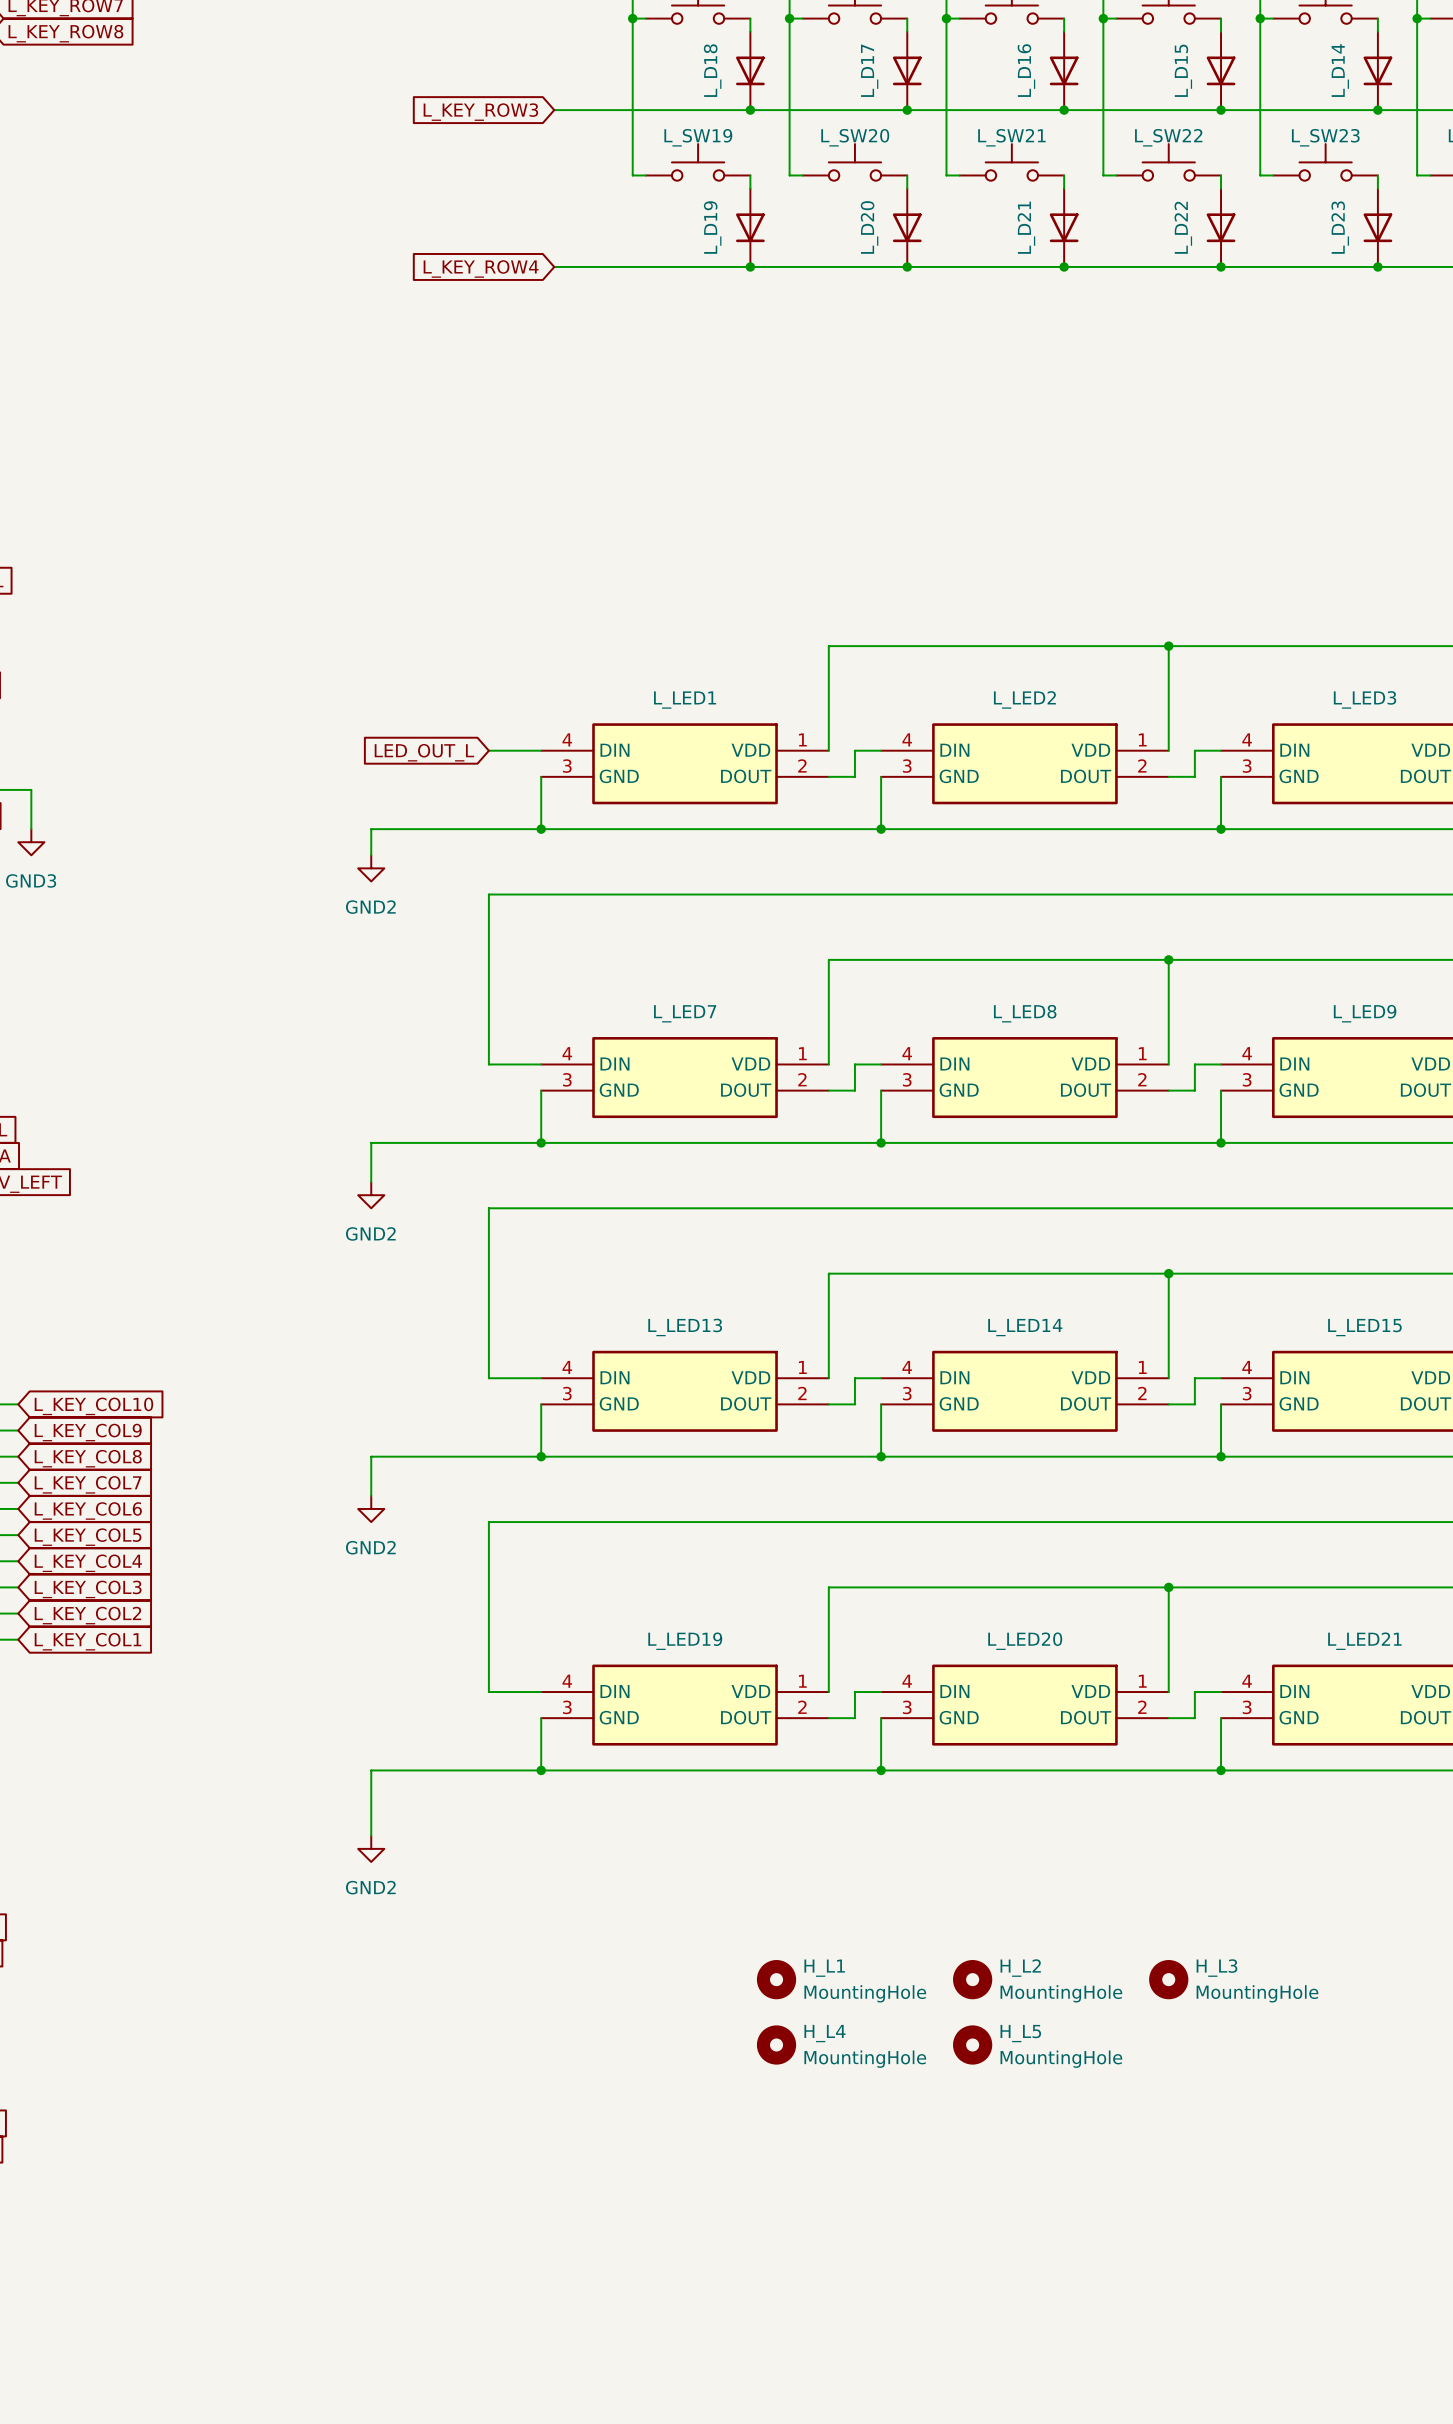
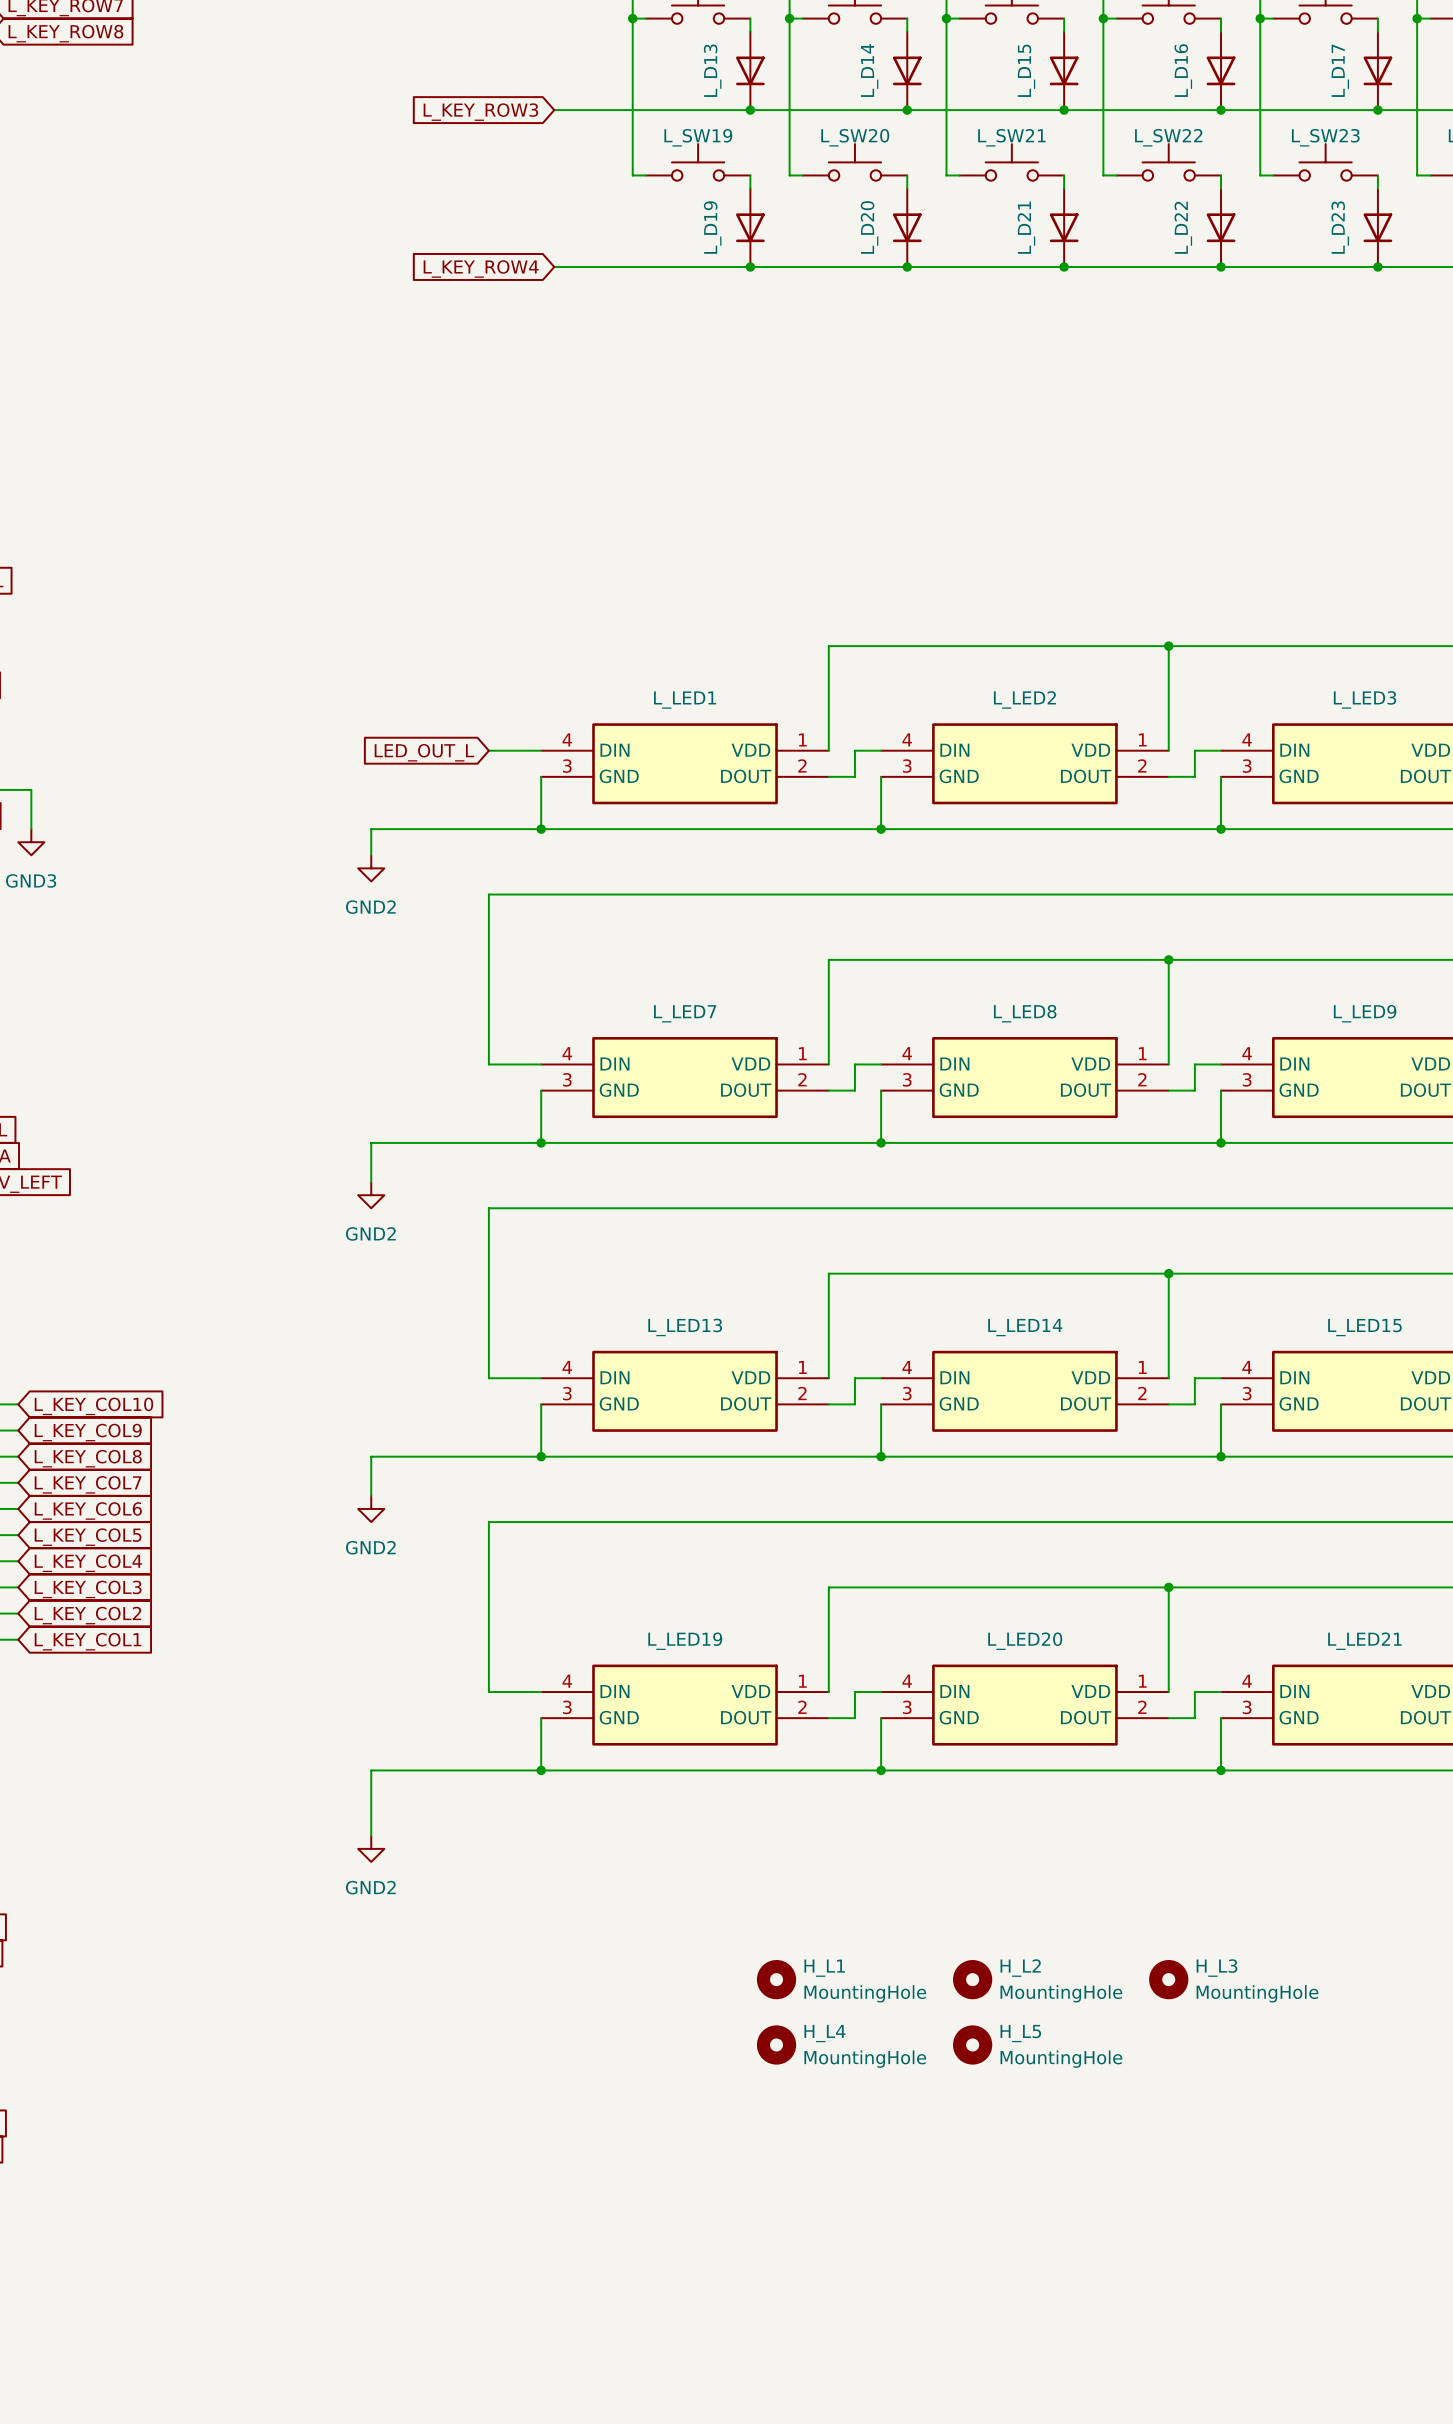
L_D18 name: L_D18 (712, 70) -> L_D13 (712, 70)
L_D17 name: L_D17 (869, 70) -> L_D14 (869, 70)
L_D16 name: L_D16 (1026, 70) -> L_D15 (1026, 70)
L_D15 name: L_D15 (1183, 70) -> L_D16 (1183, 70)
L_D14 name: L_D14 (1340, 70) -> L_D17 (1340, 70)

